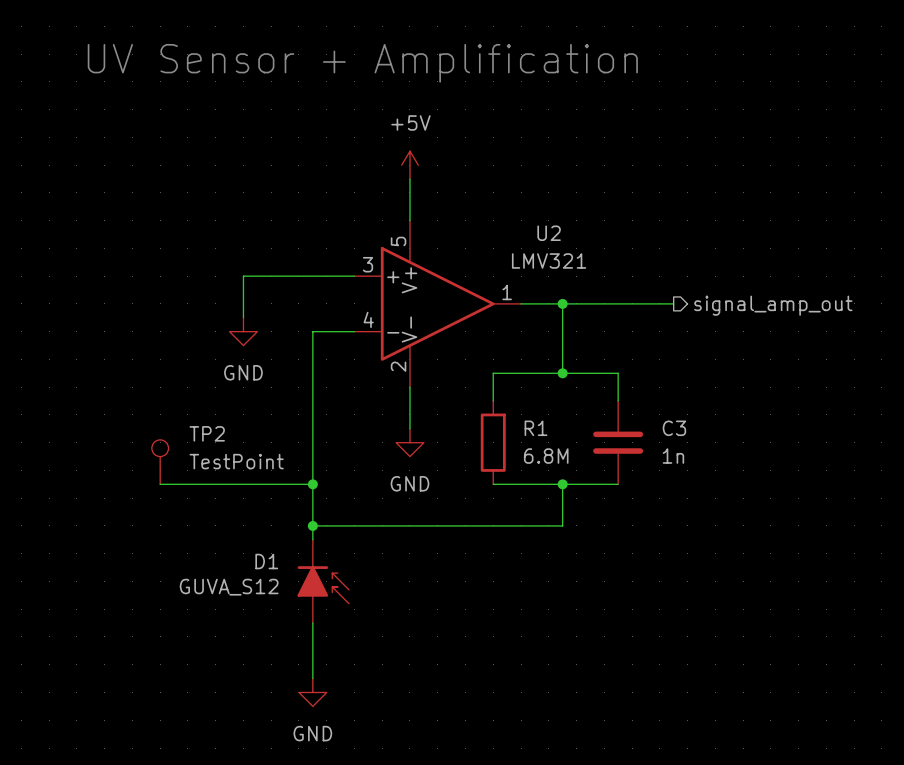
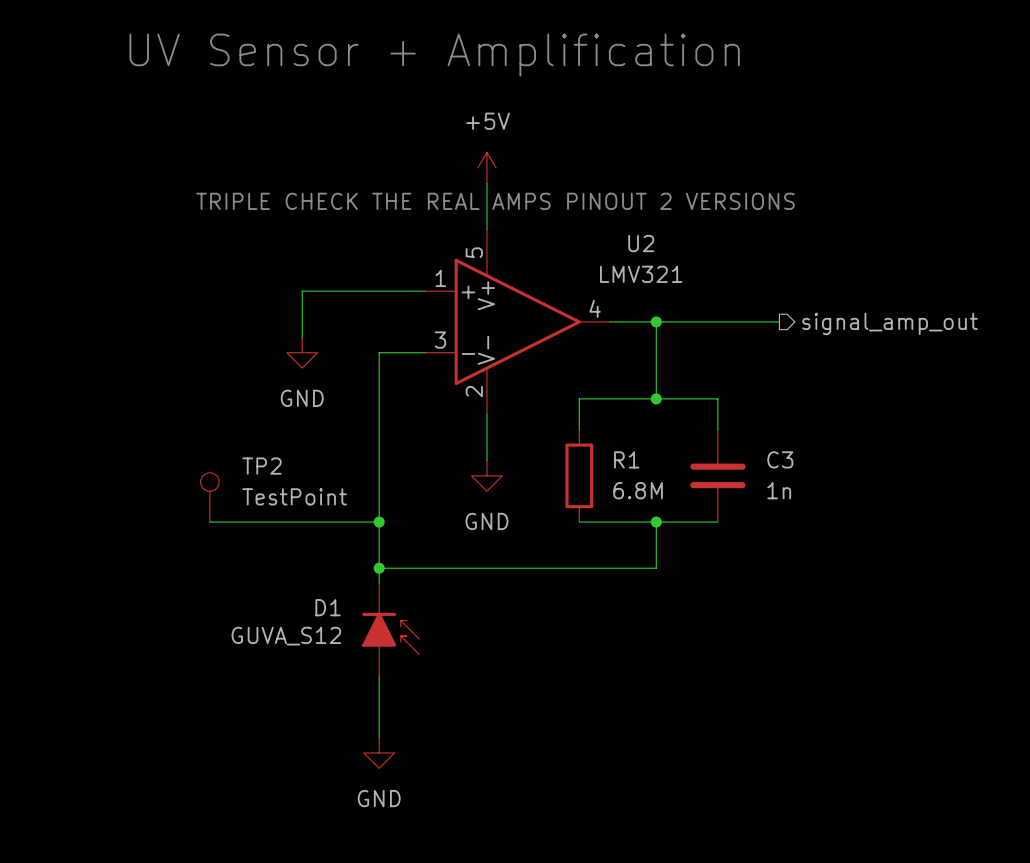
text: none -> TRIPLE CHECK THE REAL AMPS PINOUT 2 VERSIONS (495, 201)
U2 pin number: 3 (368, 264) -> 1 (440, 278)
U2 pin number: 1 (507, 292) -> 4 (595, 308)
U2 pin number: 4 (368, 319) -> 3 (440, 340)

